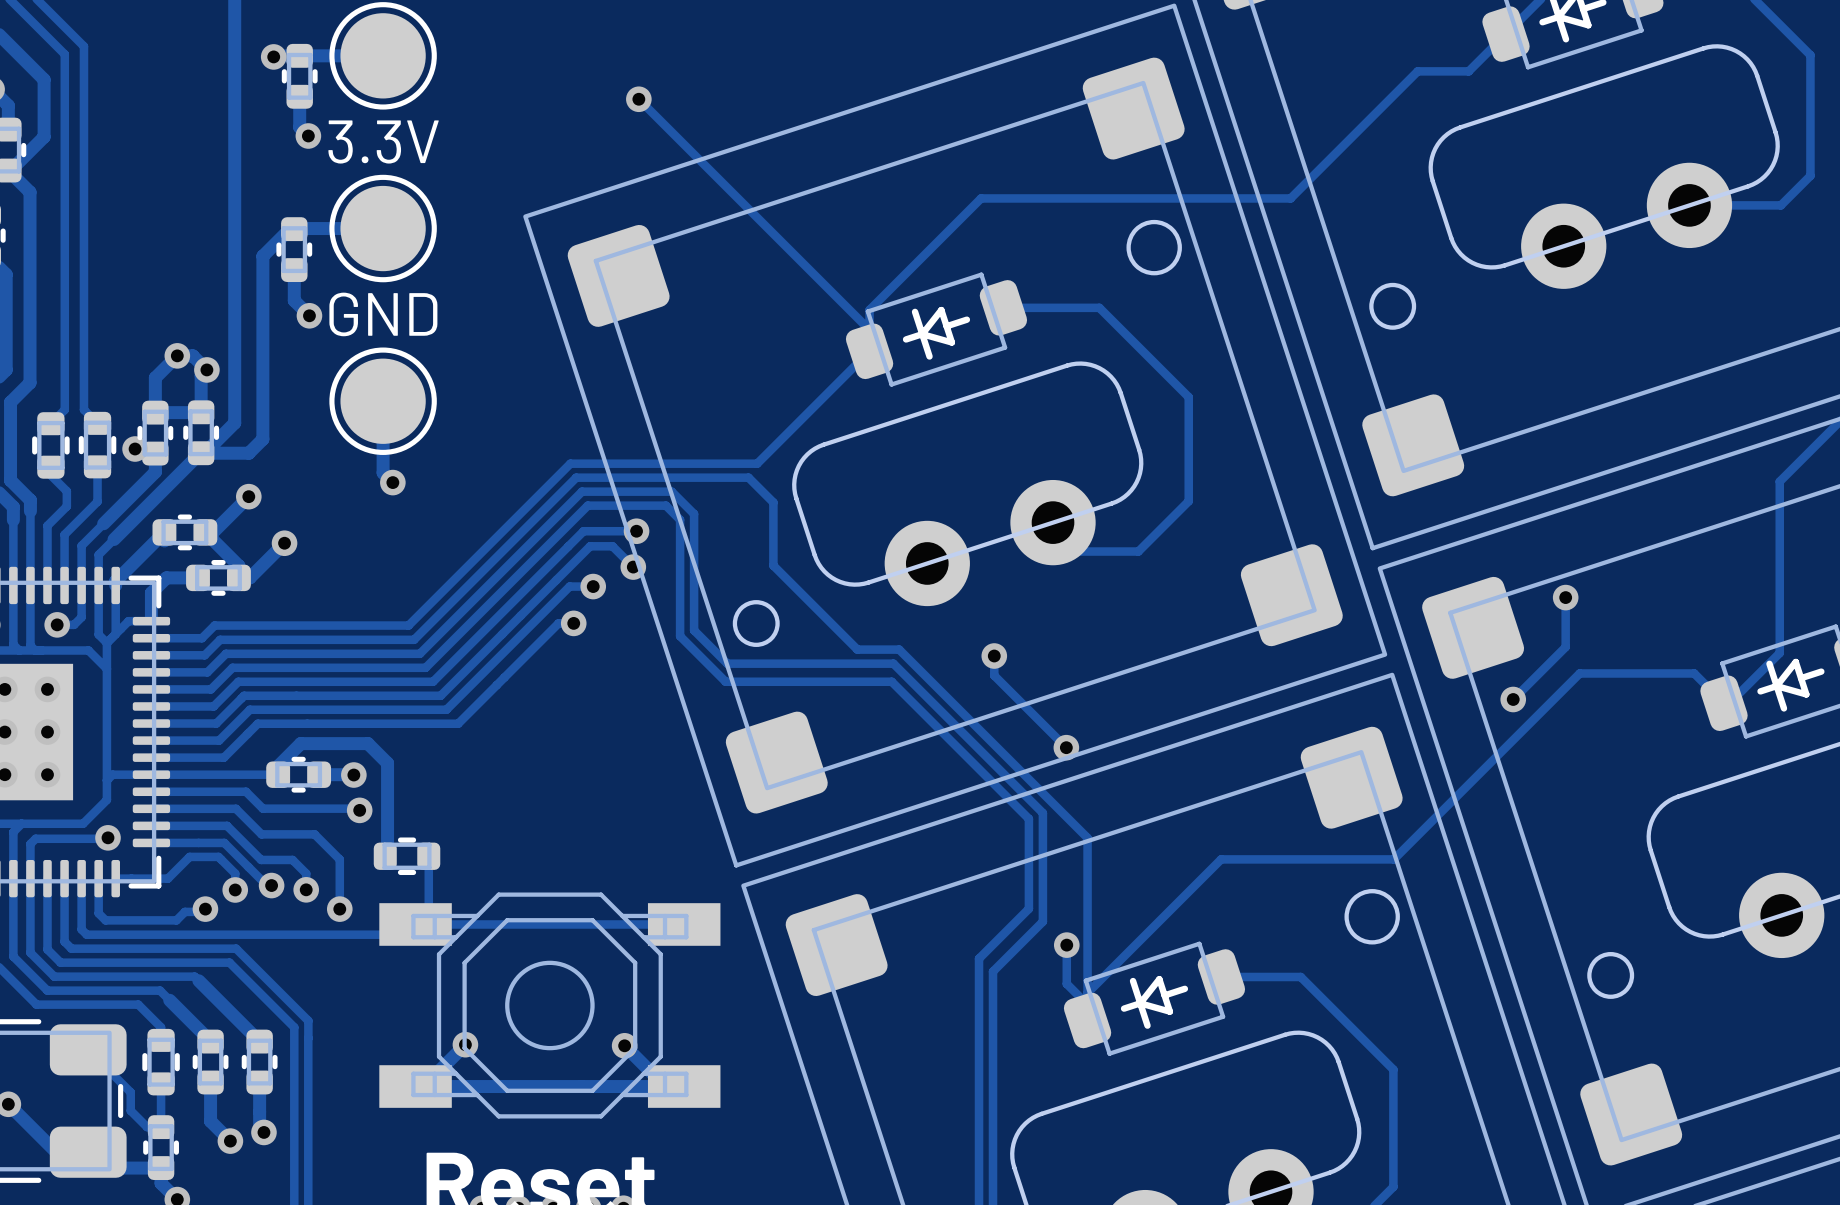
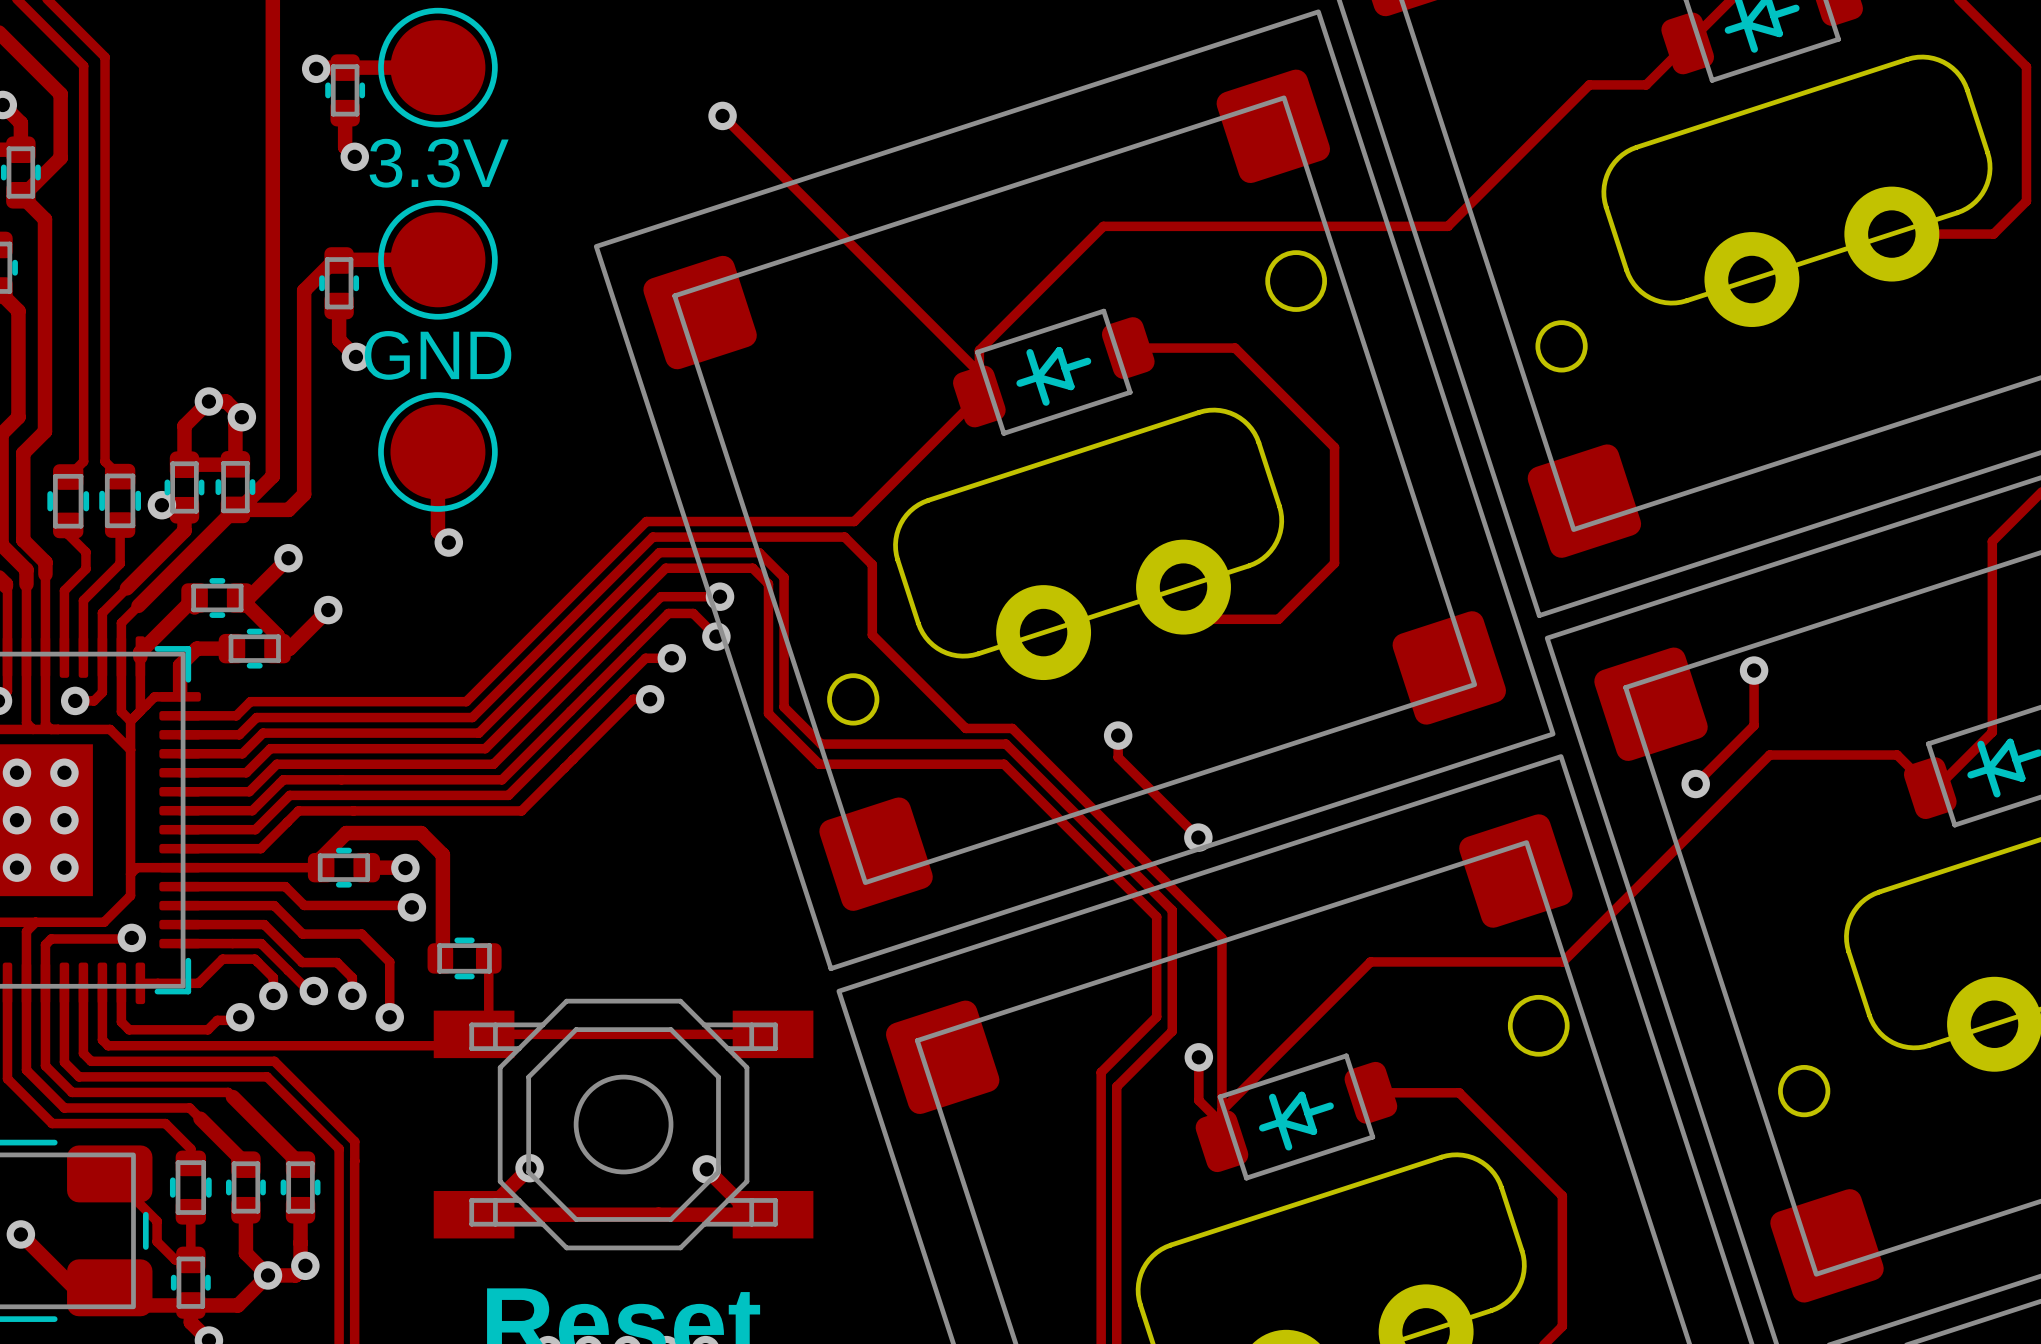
track: none -> (305, 1265) (295, 1275) (267, 1275) (237, 1305) (190, 1305)

